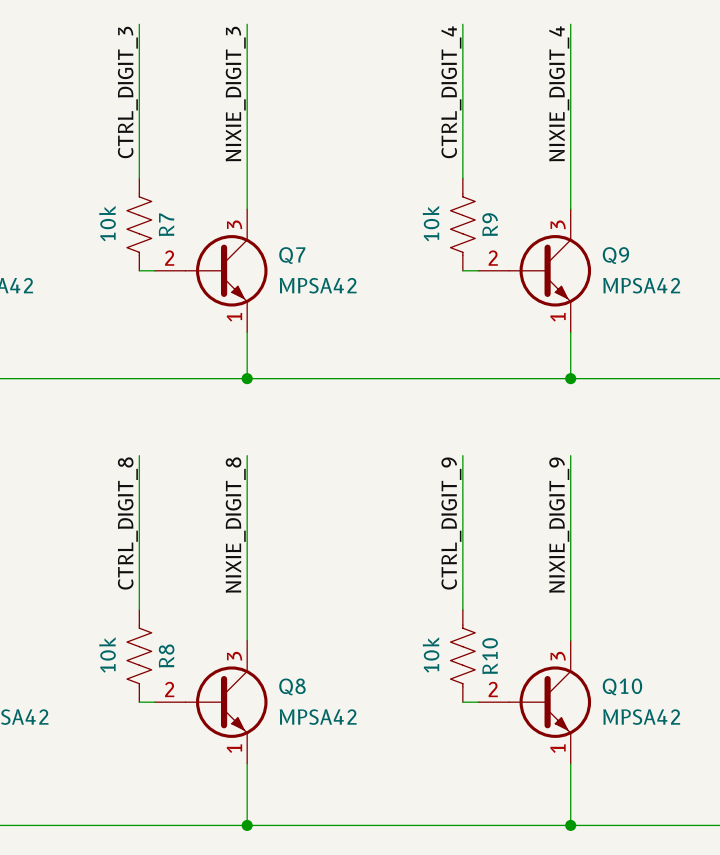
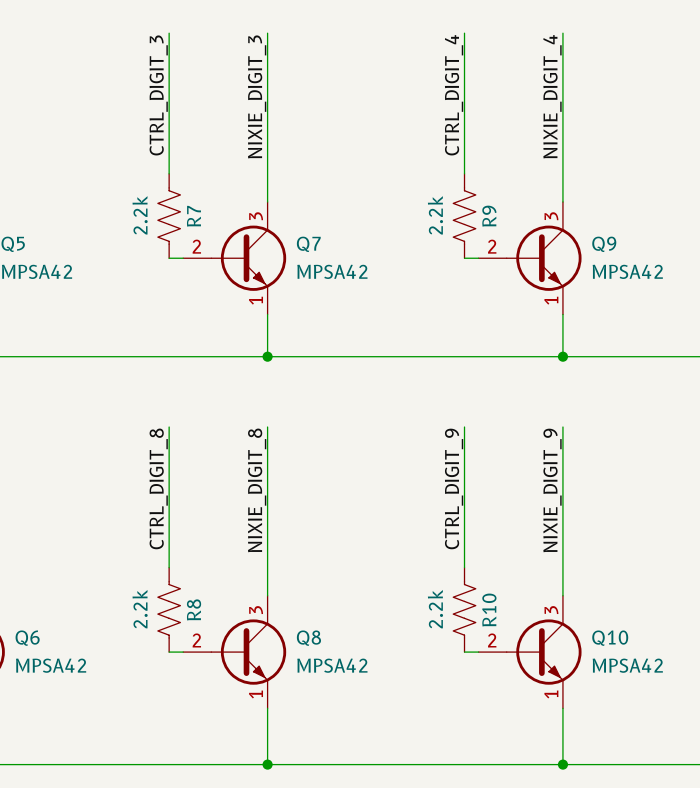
R7 value: 10k (107, 223) -> 2.2k (140, 215)
R9 value: 10k (431, 223) -> 2.2k (435, 215)
R8 value: 10k (107, 654) -> 2.2k (140, 609)
R10 value: 10k (431, 654) -> 2.2k (435, 609)

